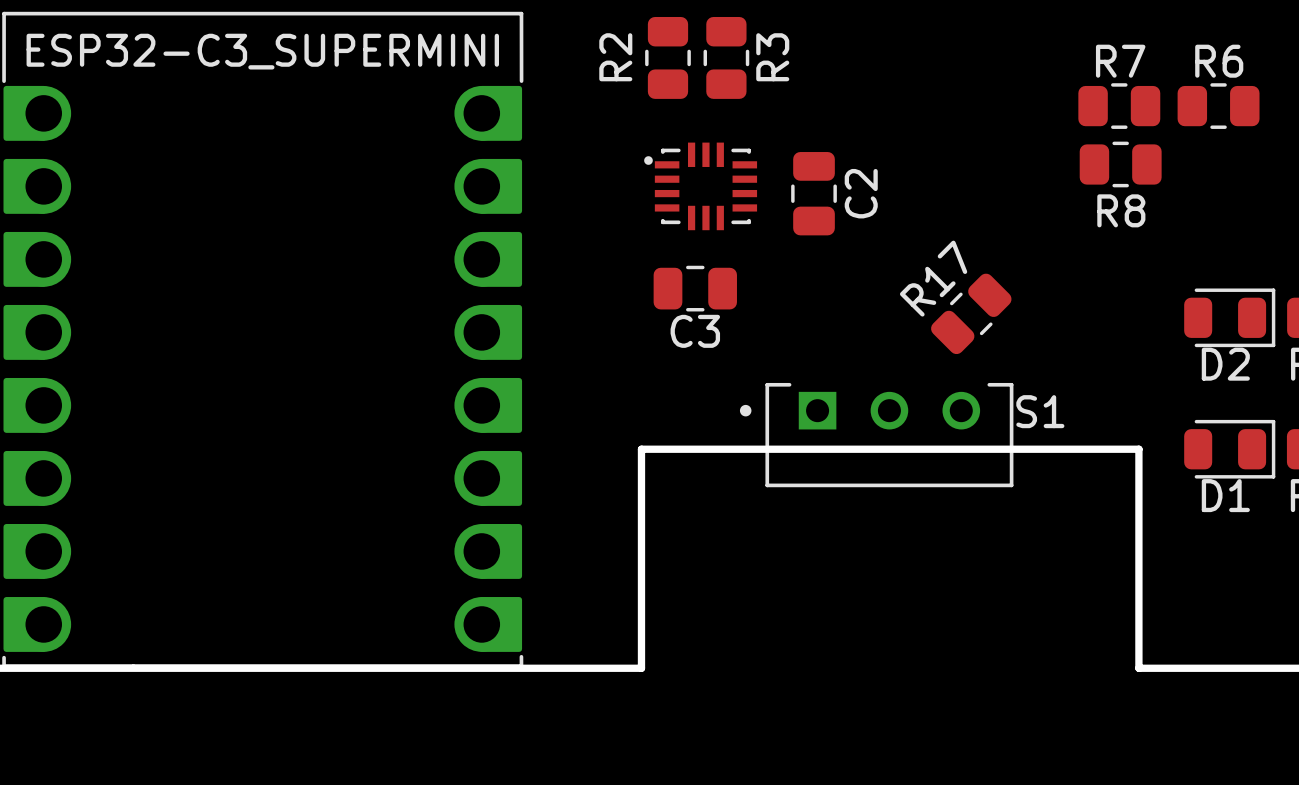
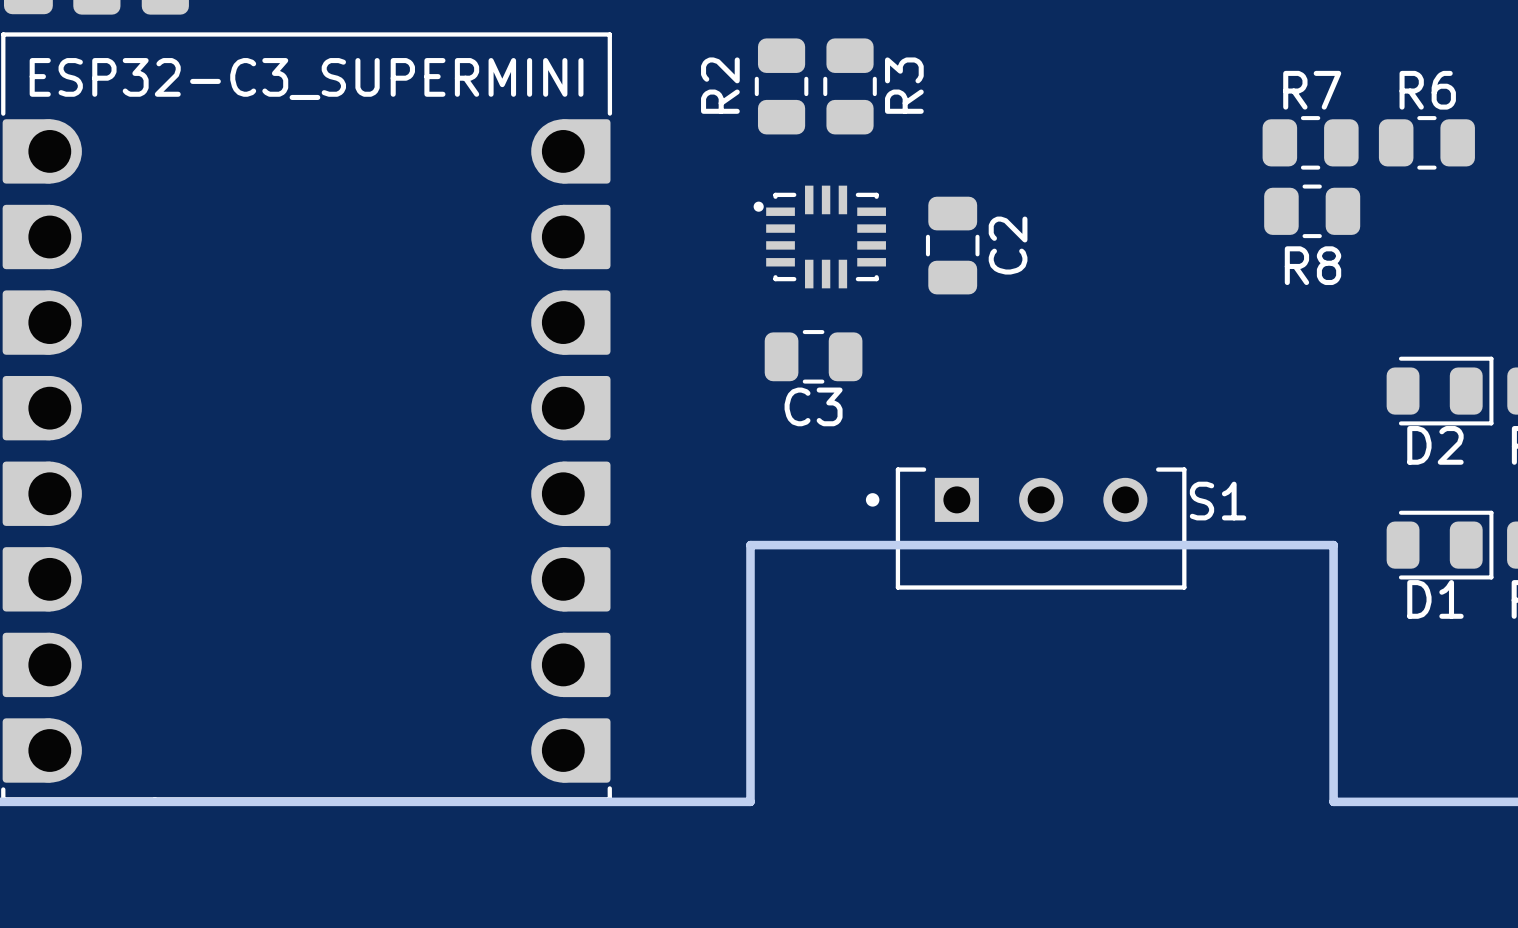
R17: (971, 313) -> none

